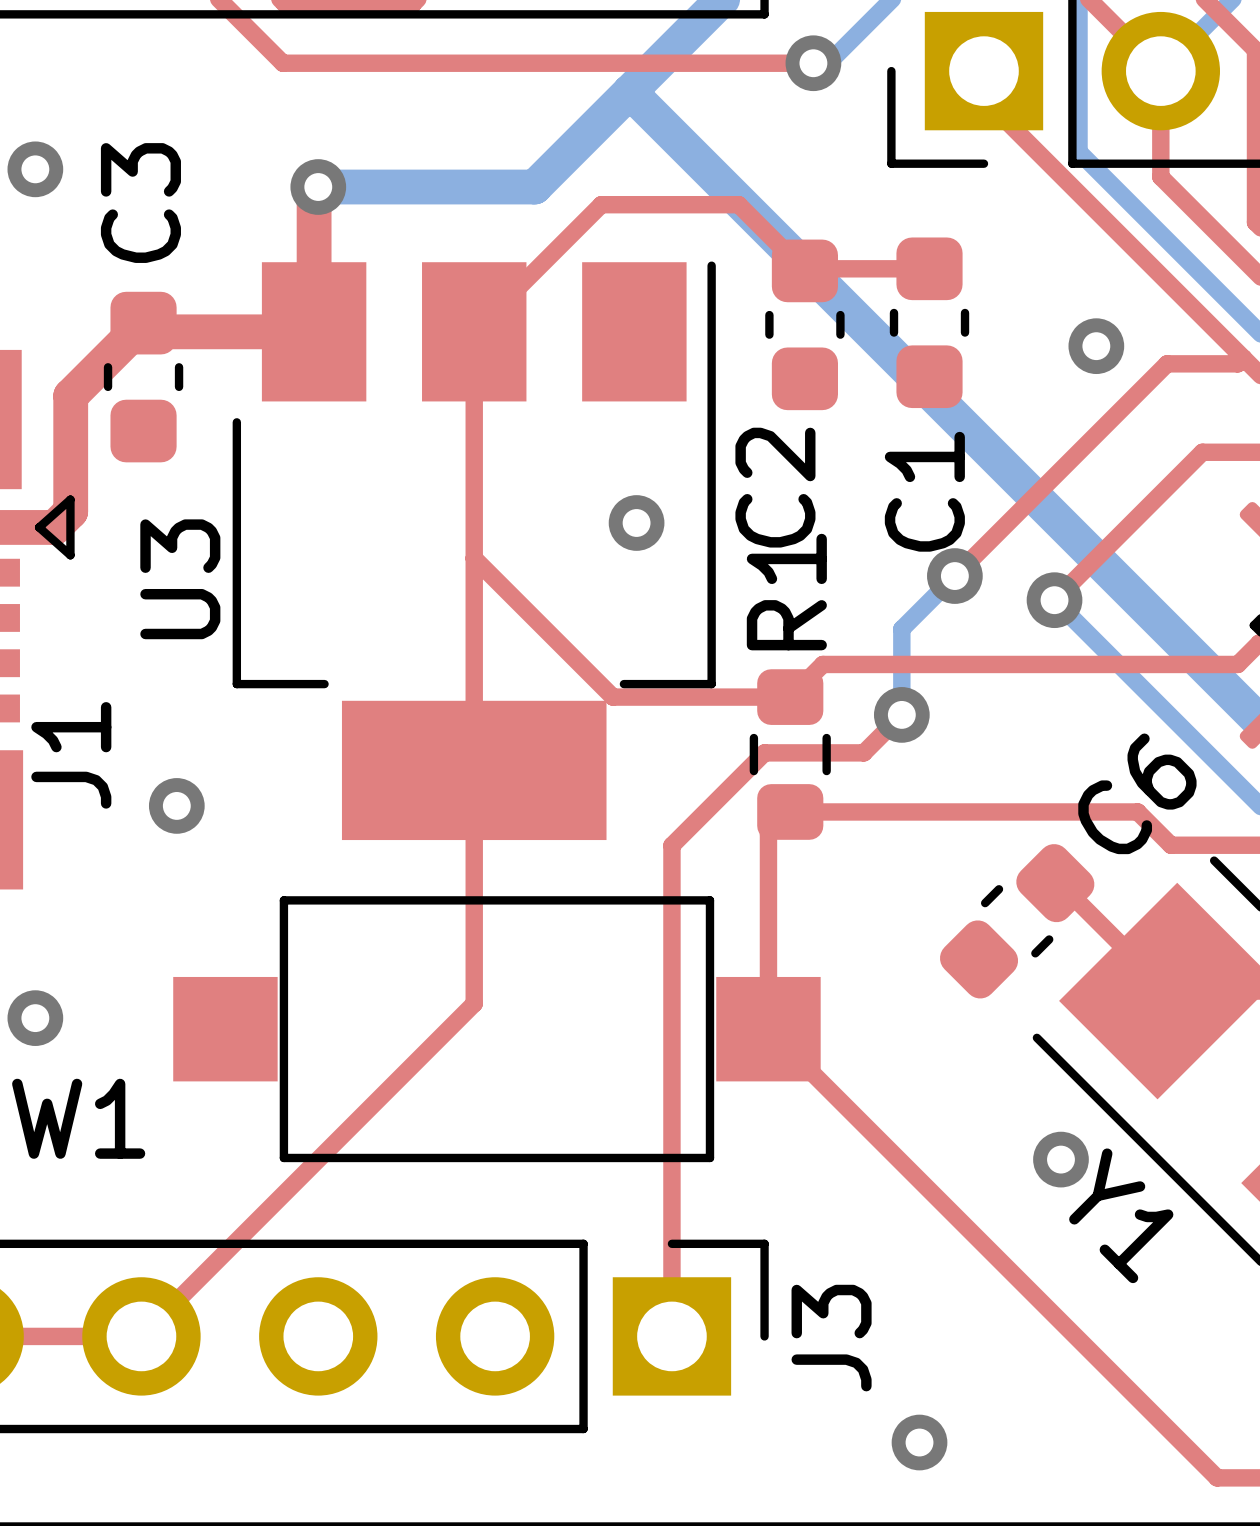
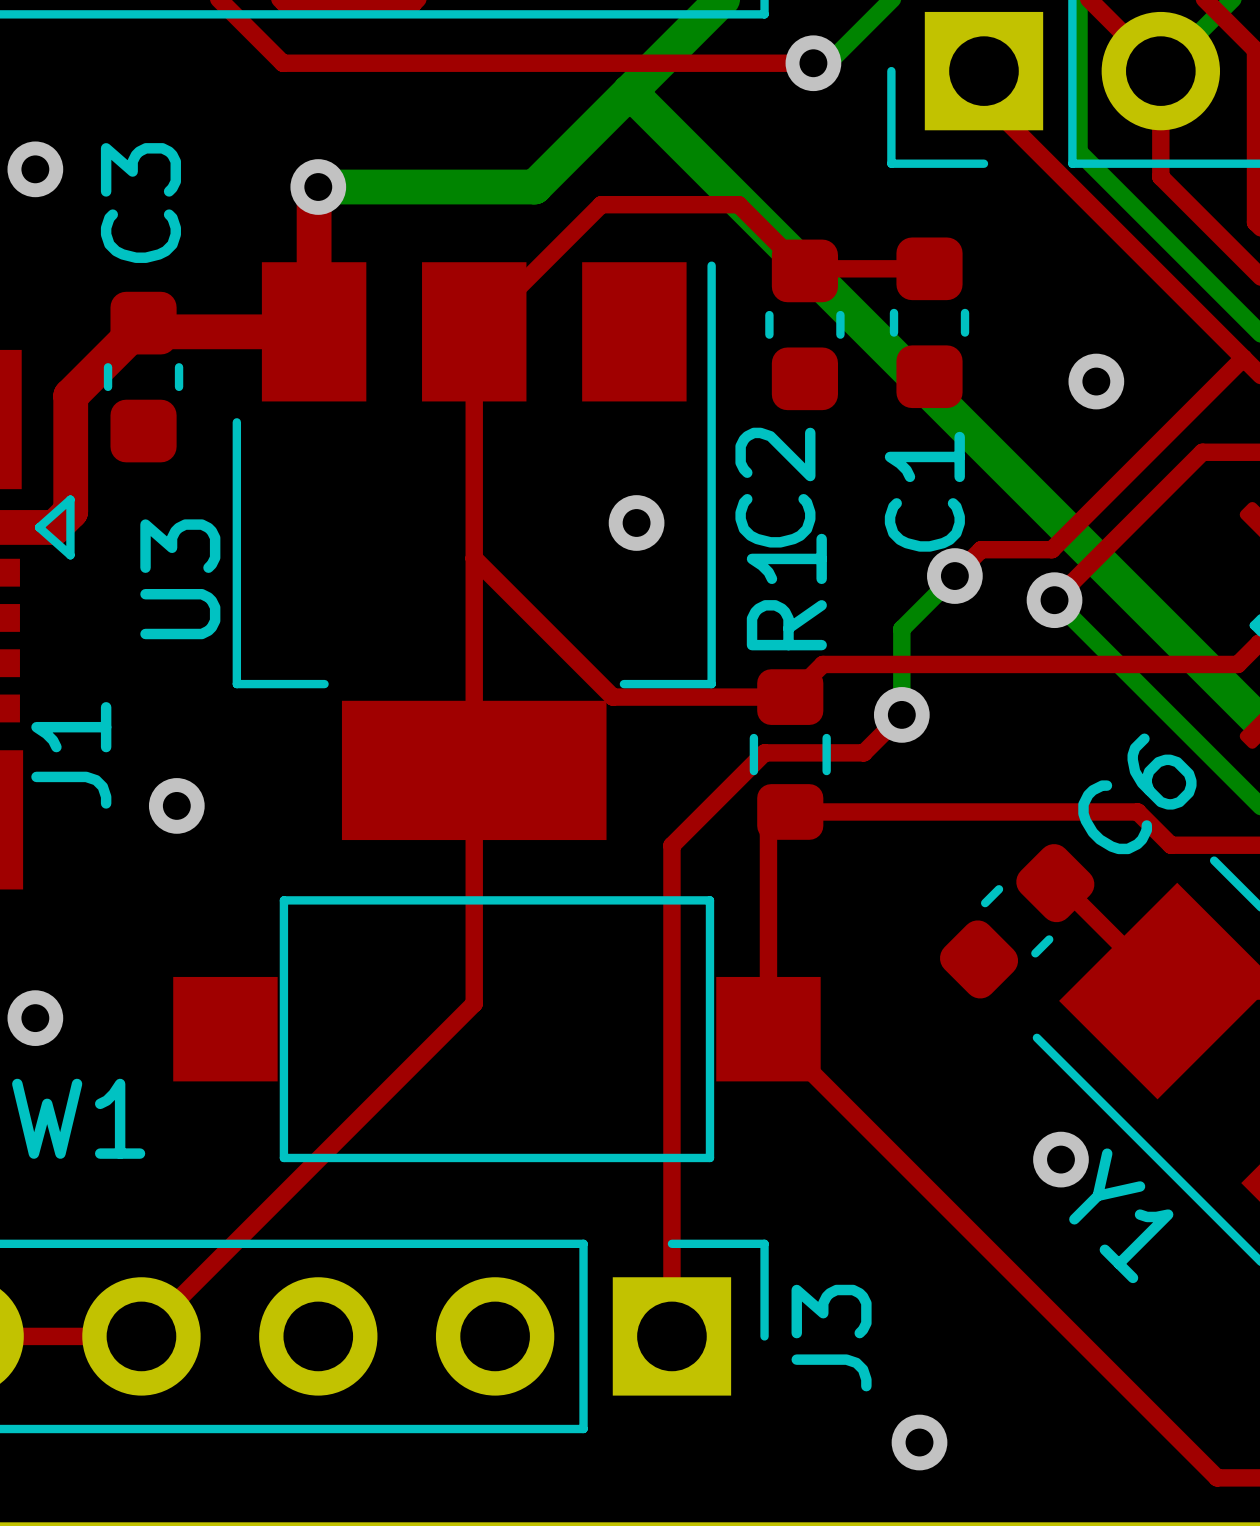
via position: (1096, 346) -> (1096, 381)
top track: (1237, 363) (1167, 363) (981, 549) -> (1237, 363) (1051, 549) (981, 549)

